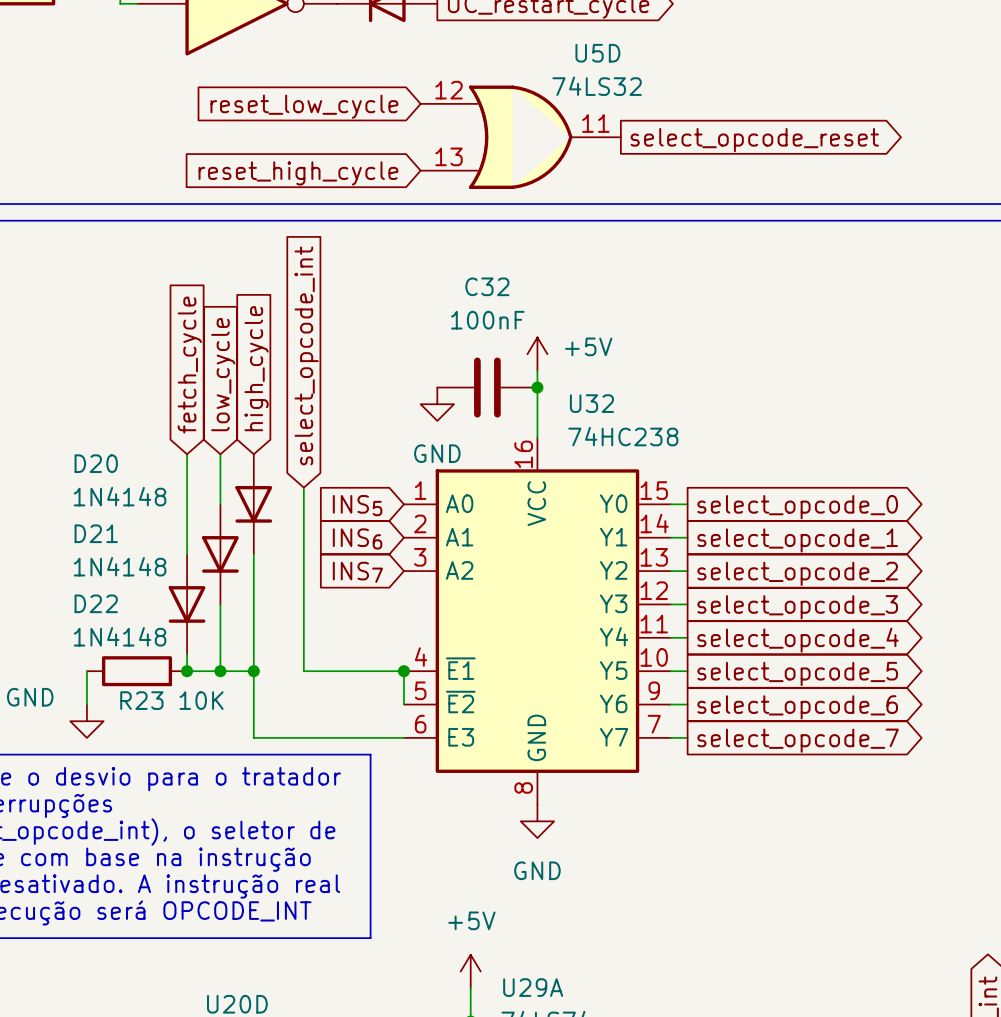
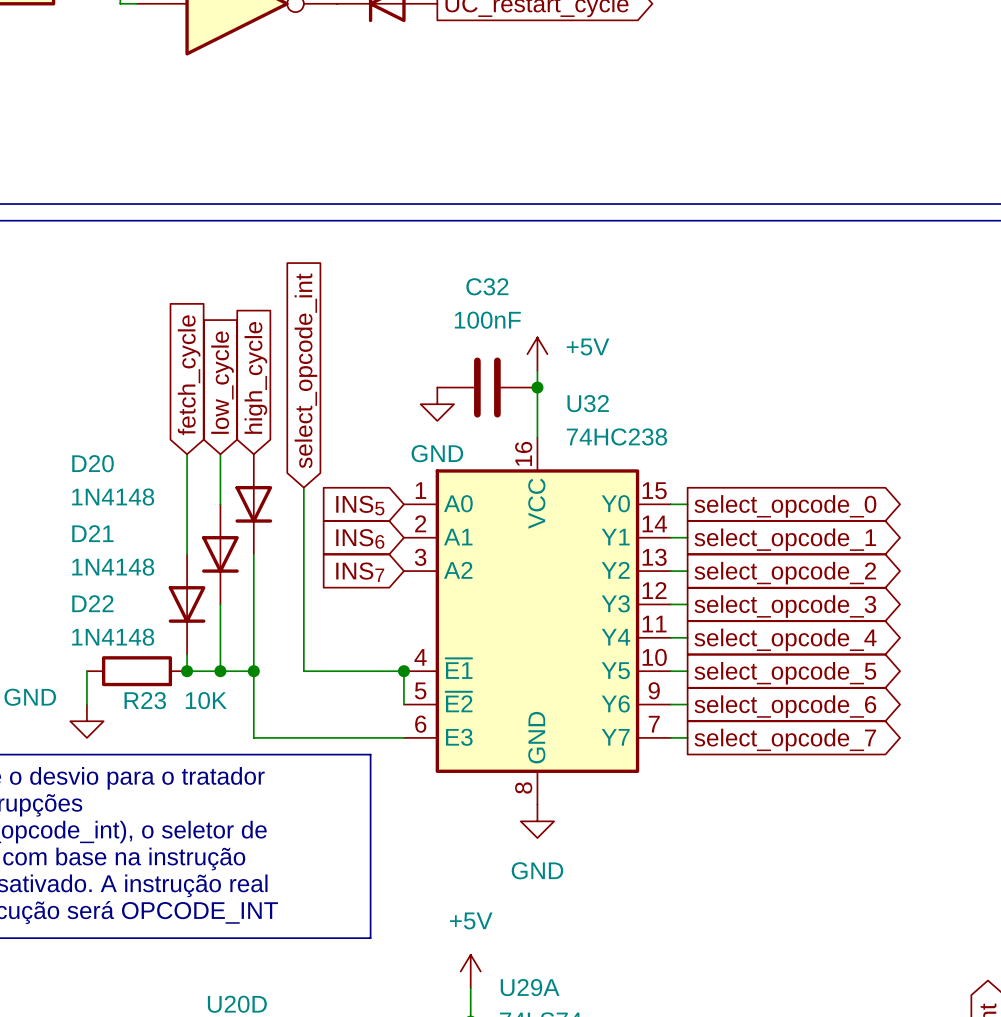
global label: reset_low_cycle (304, 106) -> none
U5D: 74LS32 (520, 137) -> none
global label: select_opcode_reset (754, 140) -> none
global label: reset_high_cycle (298, 173) -> none

